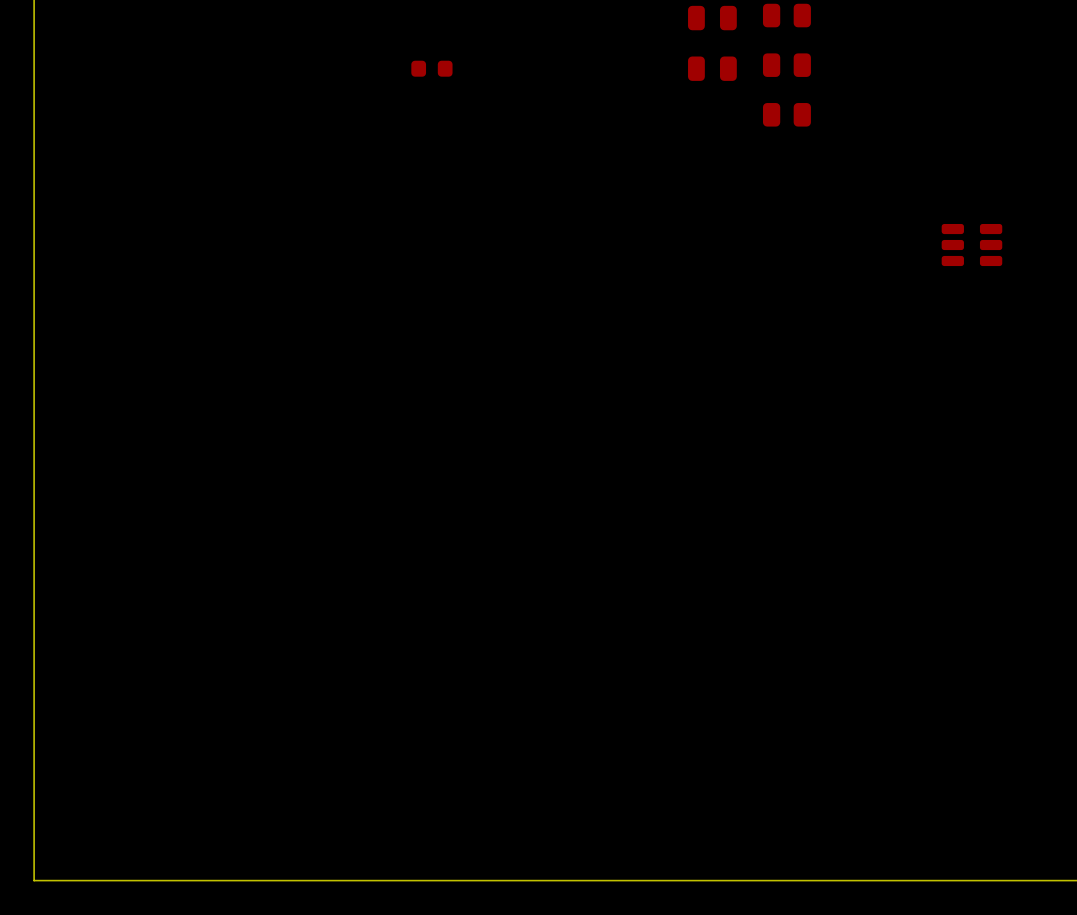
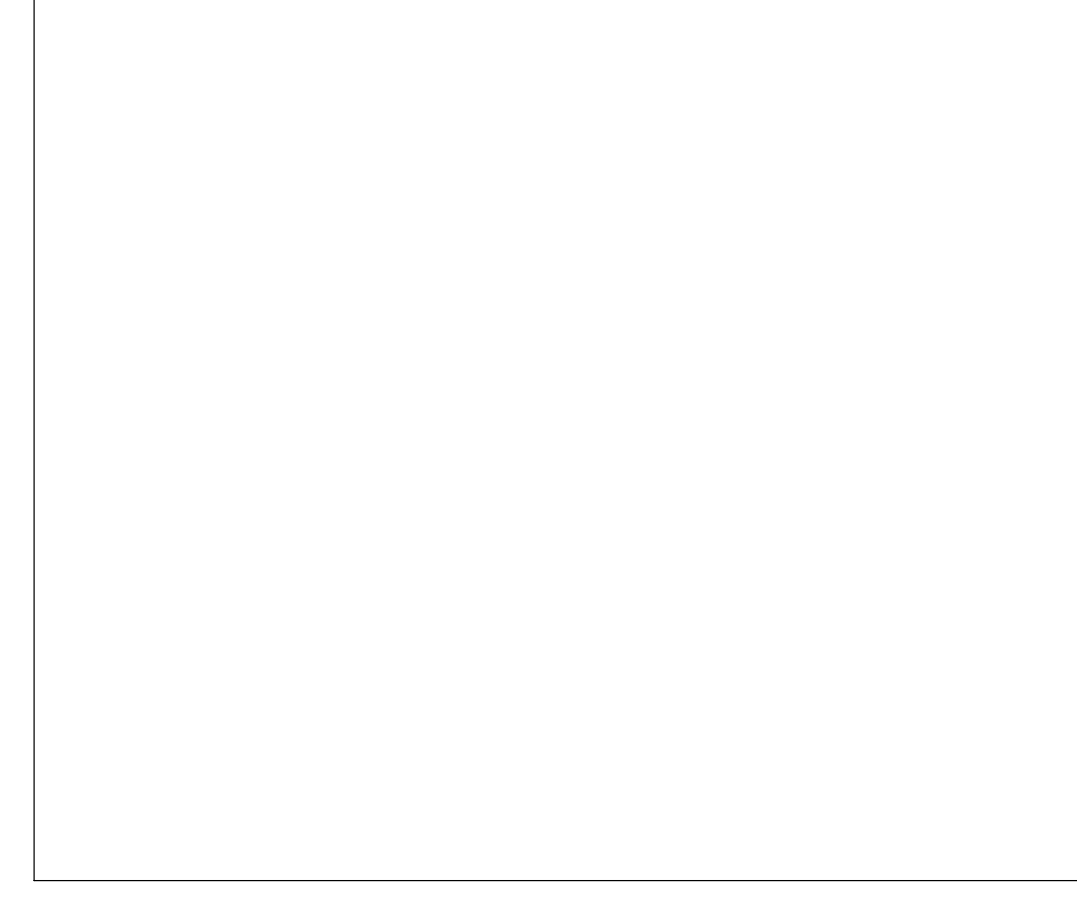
part: (786, 15) -> none
part: (712, 18) -> none
part: (786, 65) -> none
part: (431, 68) -> none
part: (712, 68) -> none
part: (786, 114) -> none
part: (971, 245) -> none

